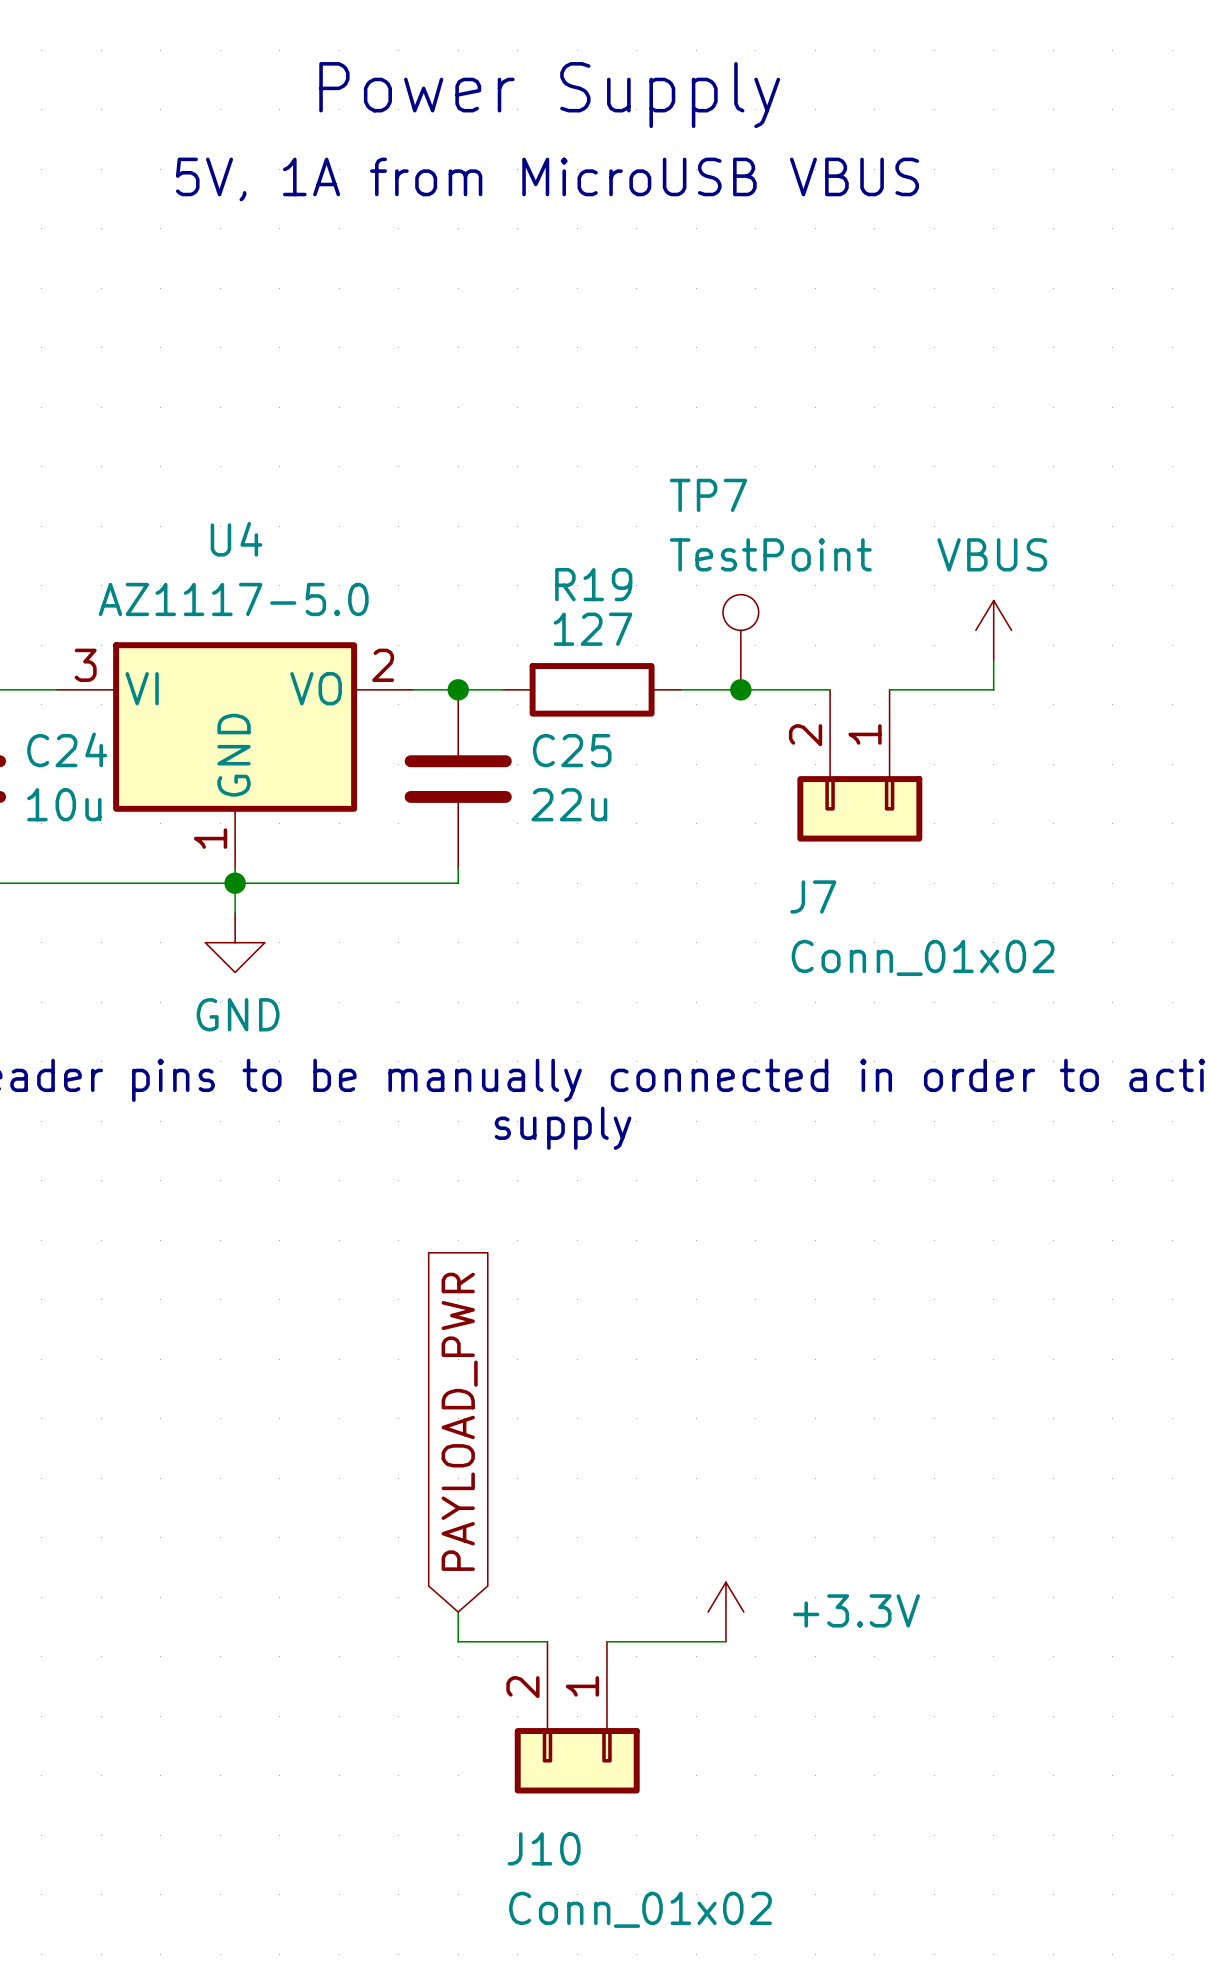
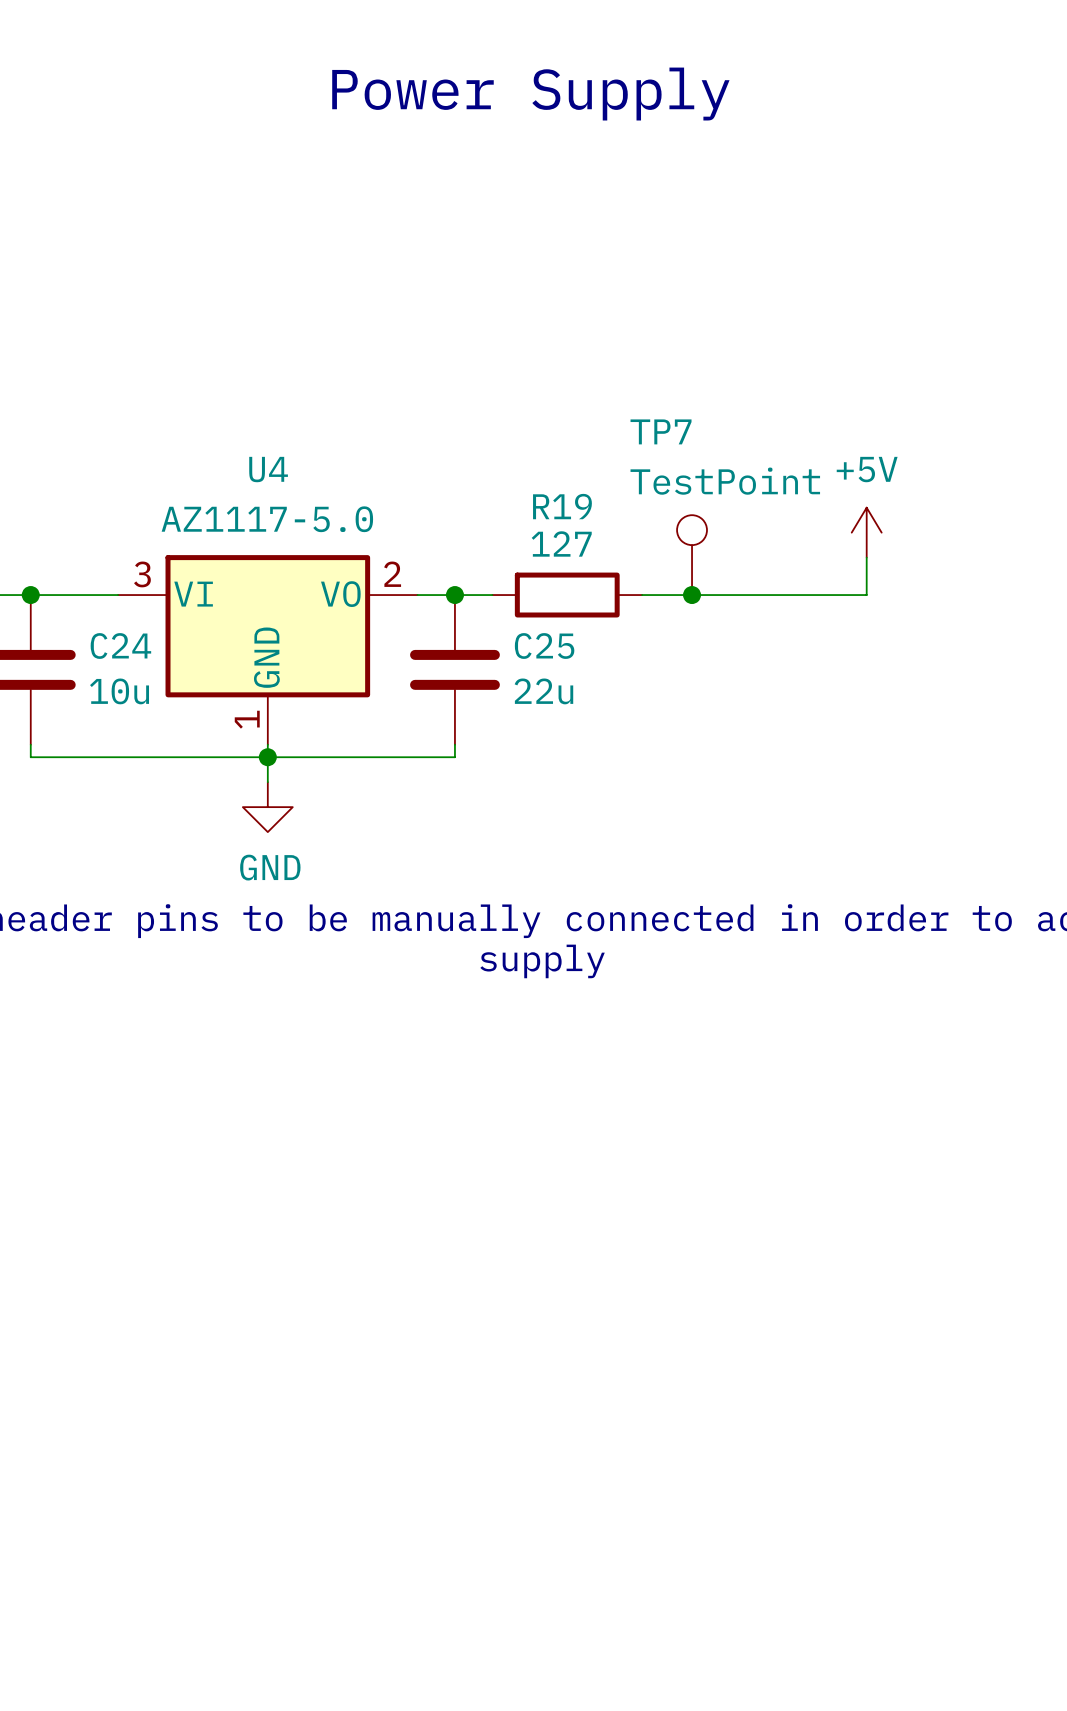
text: 5V, 1A from MicroUSB VBUS (547, 179) -> none
power symbol: none -> +5V (866, 532)
power symbol: VBUS (993, 630) -> none
wire: (993, 660) (993, 689) (949, 689) -> (866, 557) (866, 595)
wire: none -> (766, 595) (816, 595)
J7: Conn_01x02 (859, 765) -> none
global label: PAYLOAD_PWR (459, 1421) -> none
wire: (458, 1612) (458, 1641) (547, 1641) -> none
power symbol: +3.3V (725, 1612) -> none
wire: (606, 1641) (725, 1641) -> none
J10: Conn_01x02 (577, 1717) -> none

